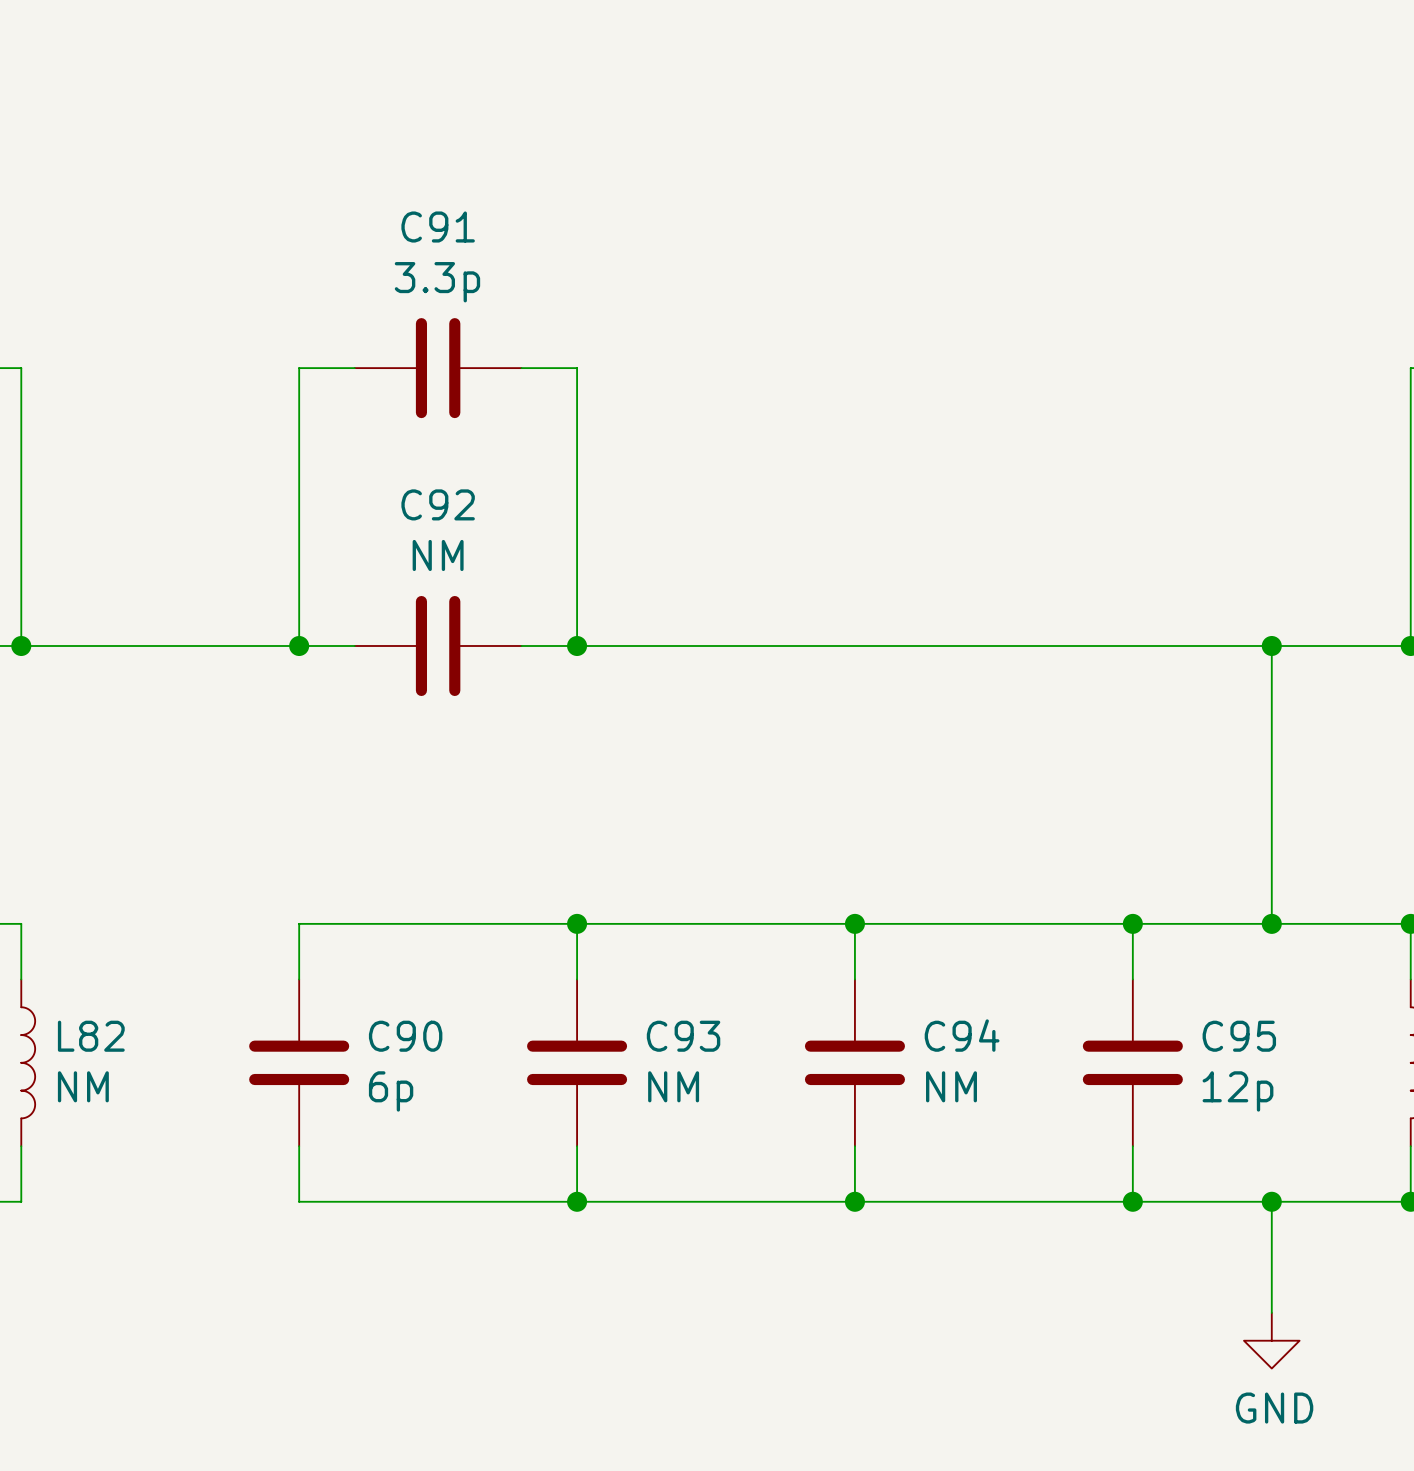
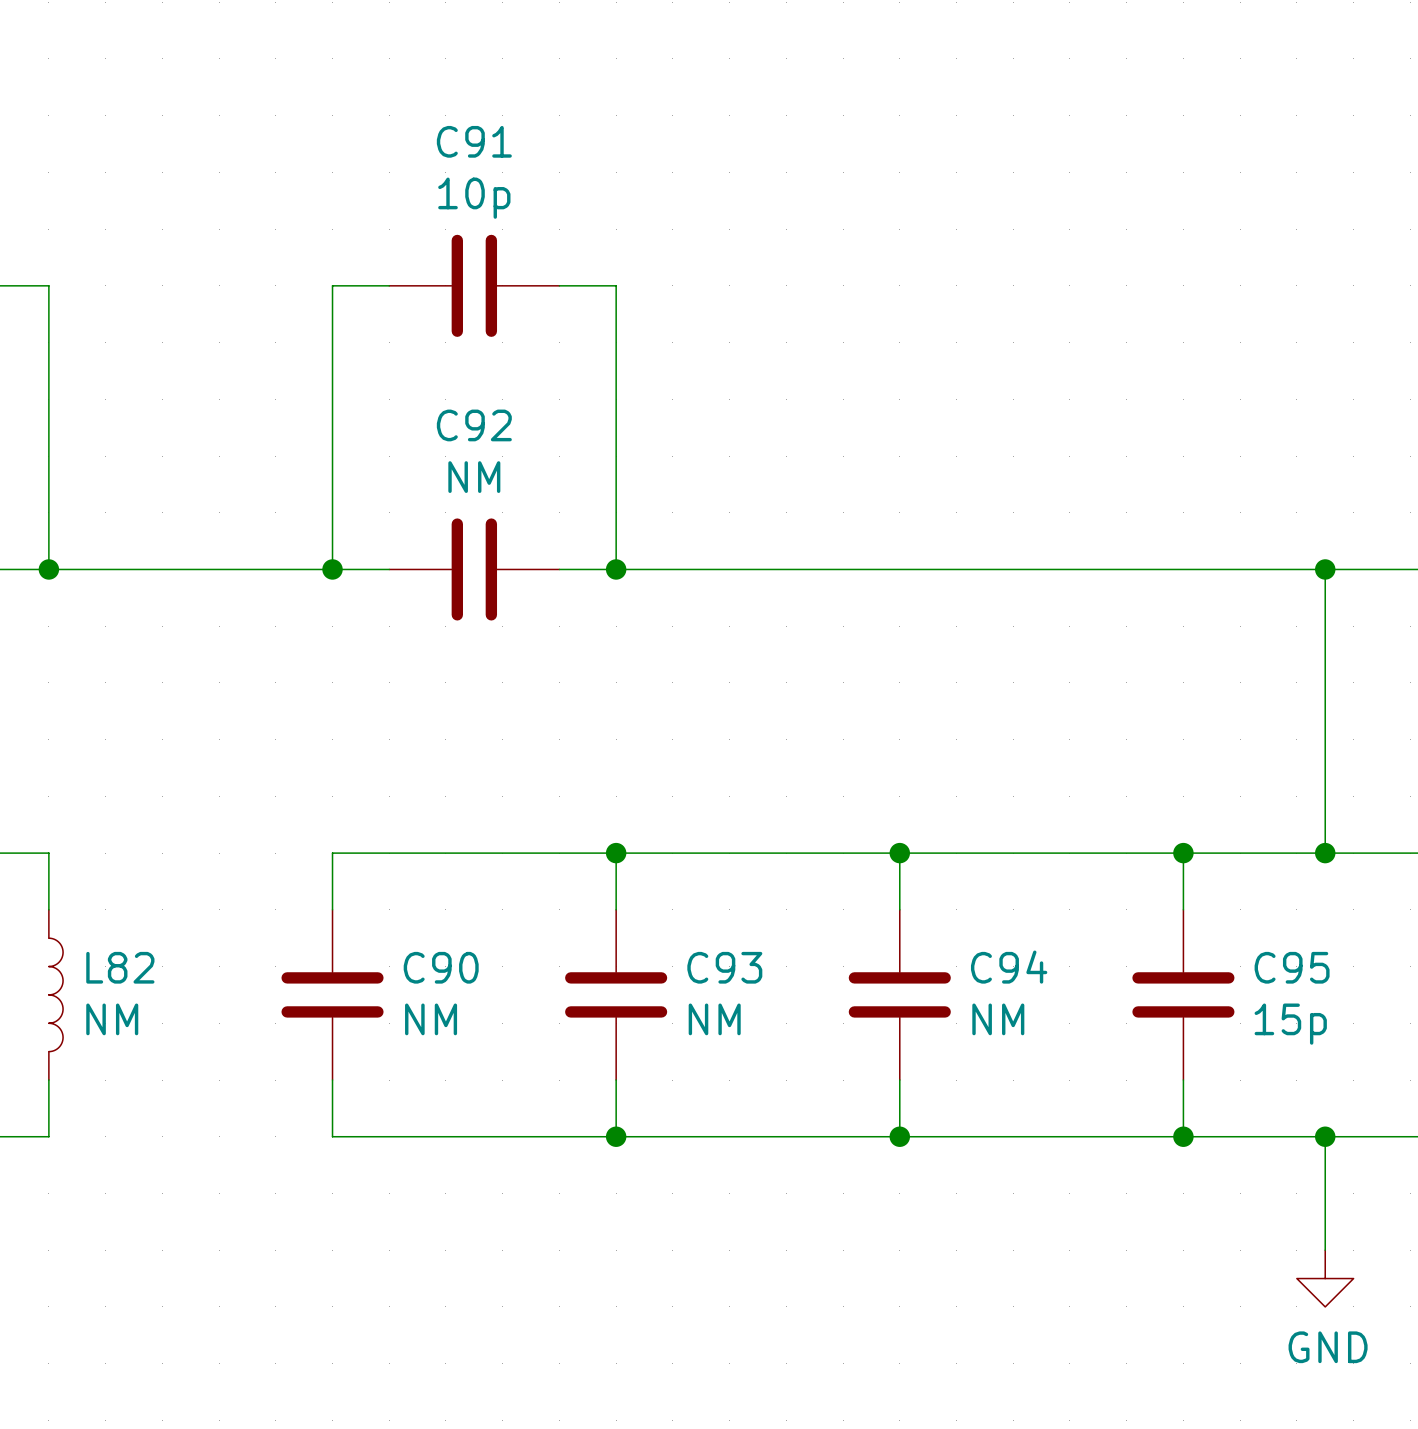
C91 value: 3.3p (437, 282) -> 10p (474, 198)
C90 value: 6p (391, 1091) -> NM (431, 1019)
C95 value: 12p (1237, 1091) -> 15p (1290, 1024)

